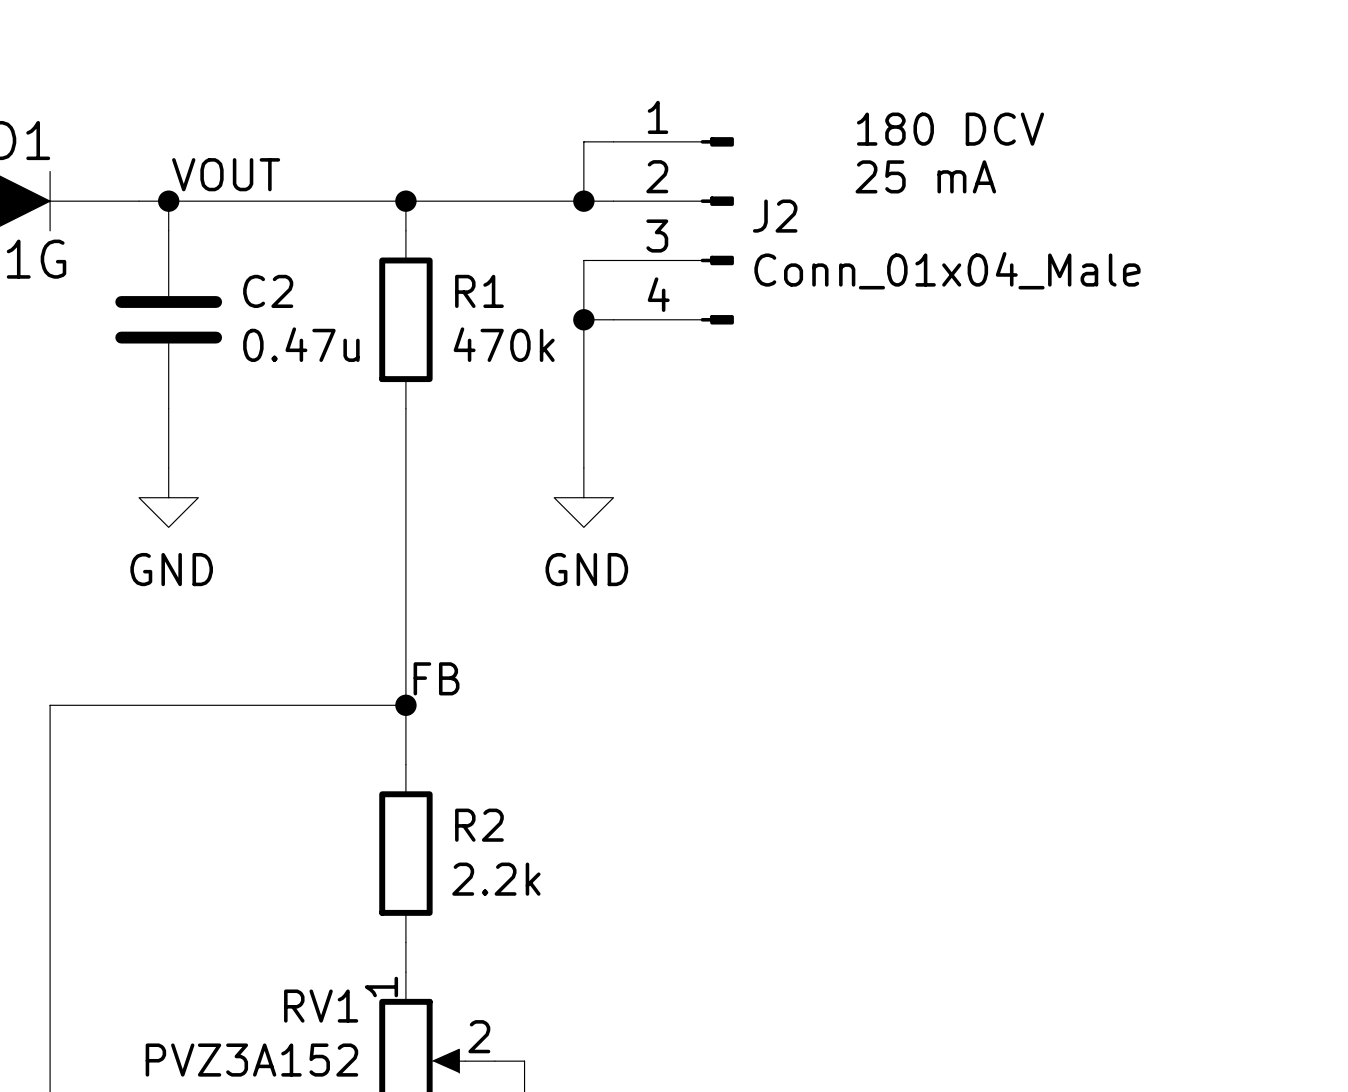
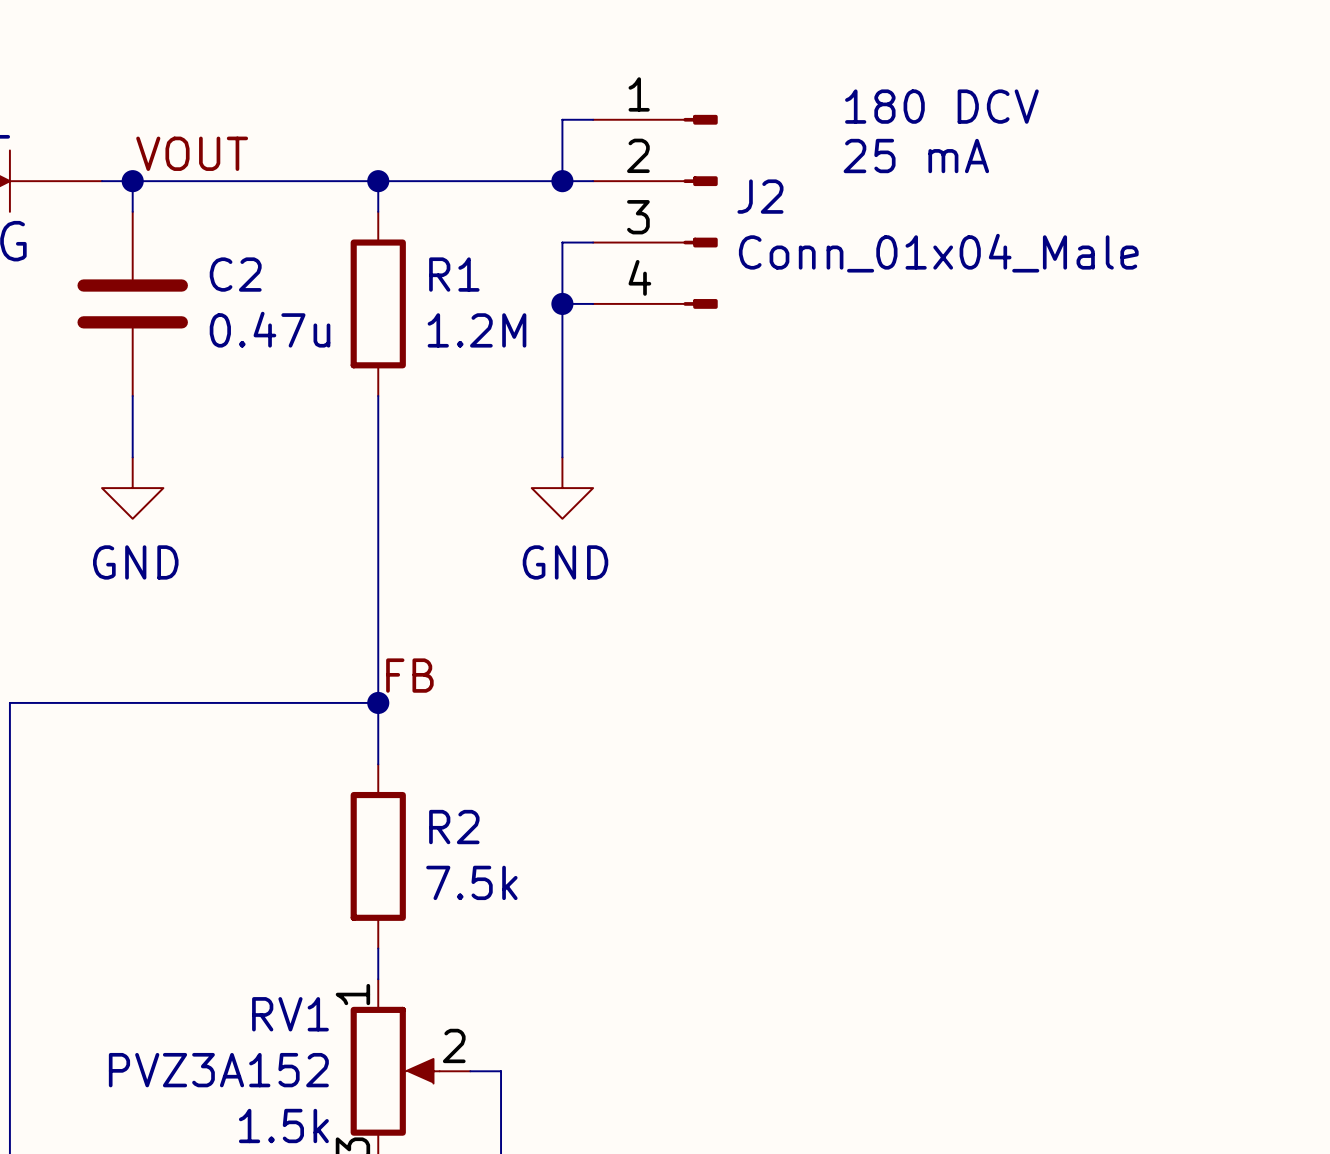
R1 value: 470k (504, 344) -> 1.2M (477, 330)
R2 value: 2.2k (496, 879) -> 7.5k (471, 882)

